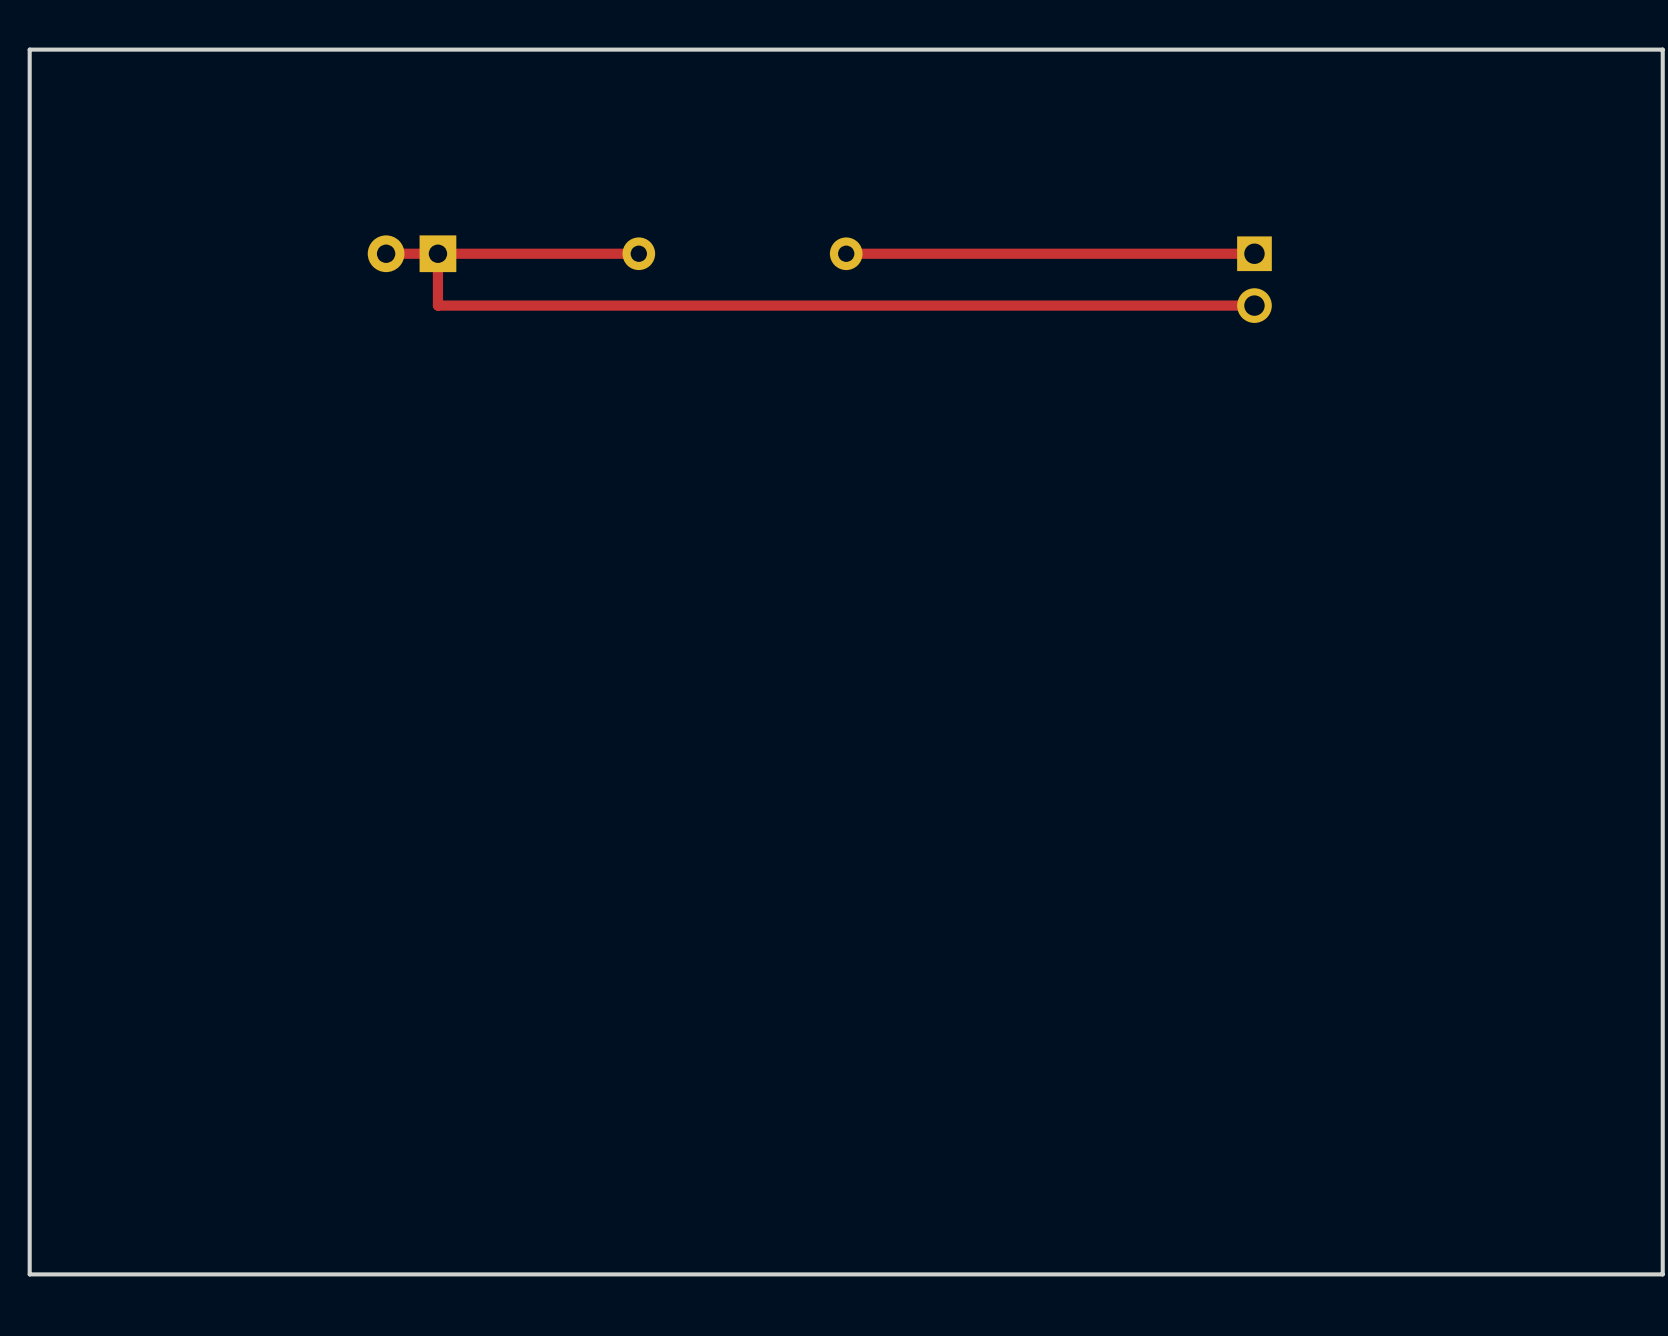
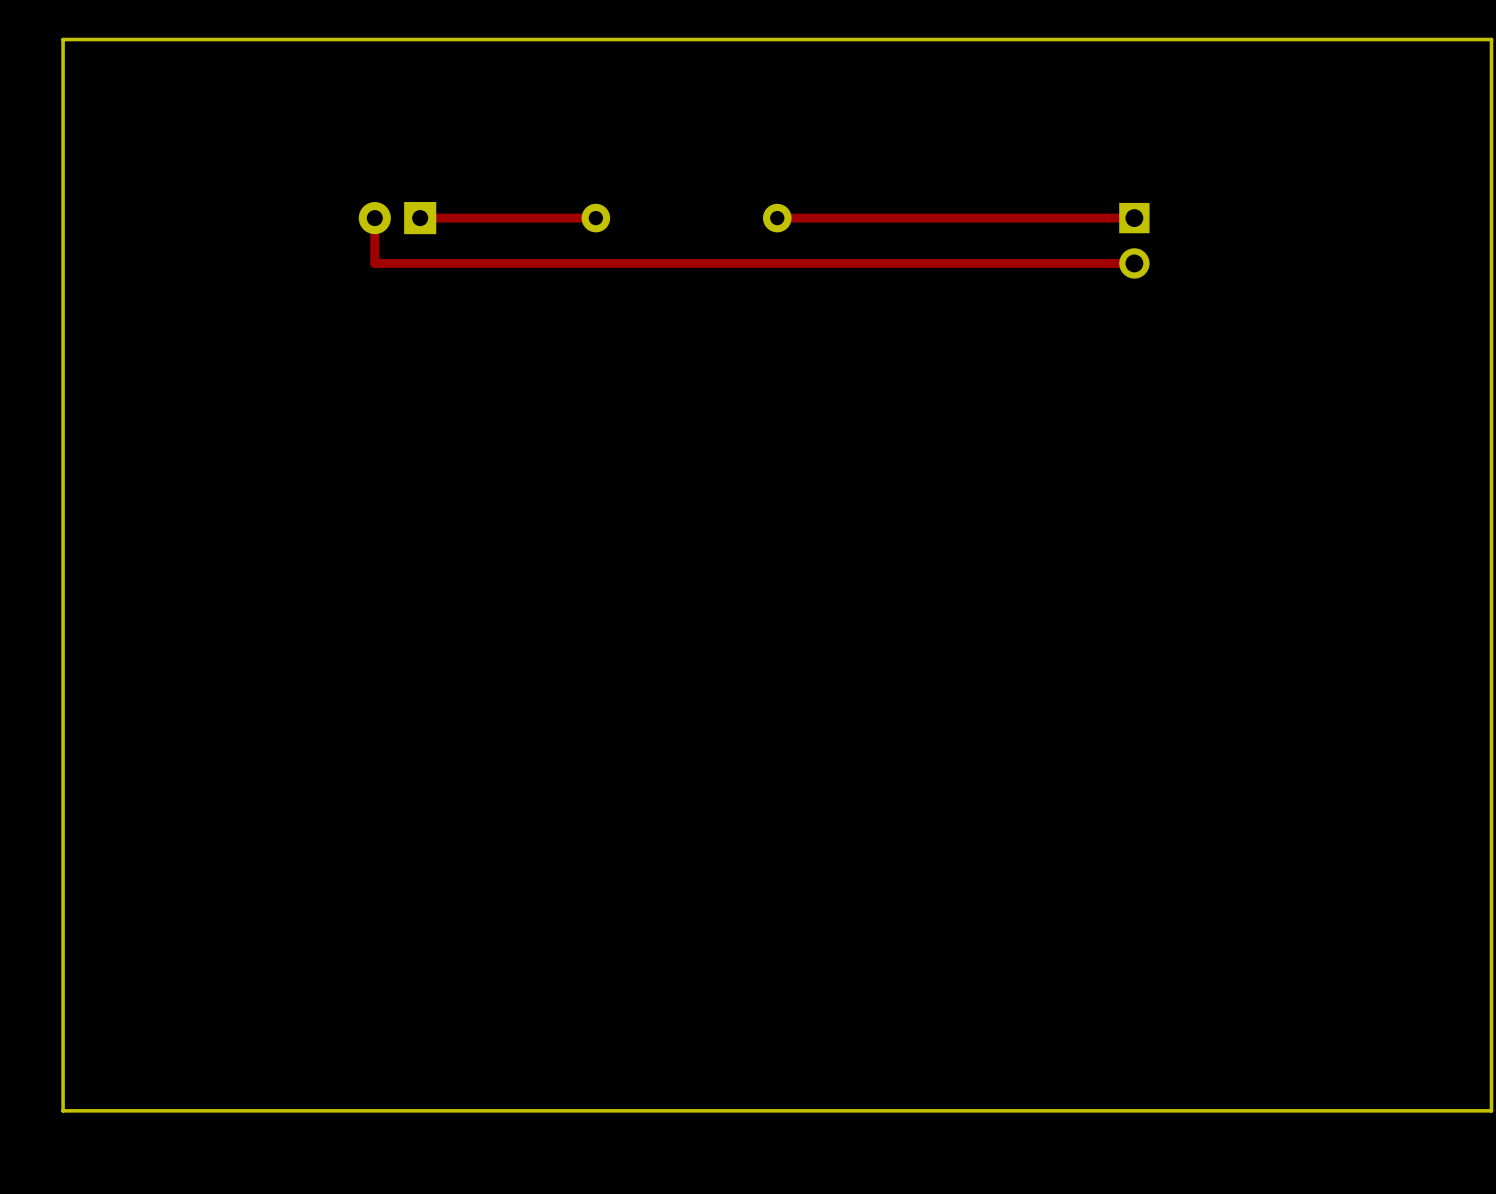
top track: (386, 253) (437, 253) (437, 305) -> (374, 218) (374, 263) (420, 263)

